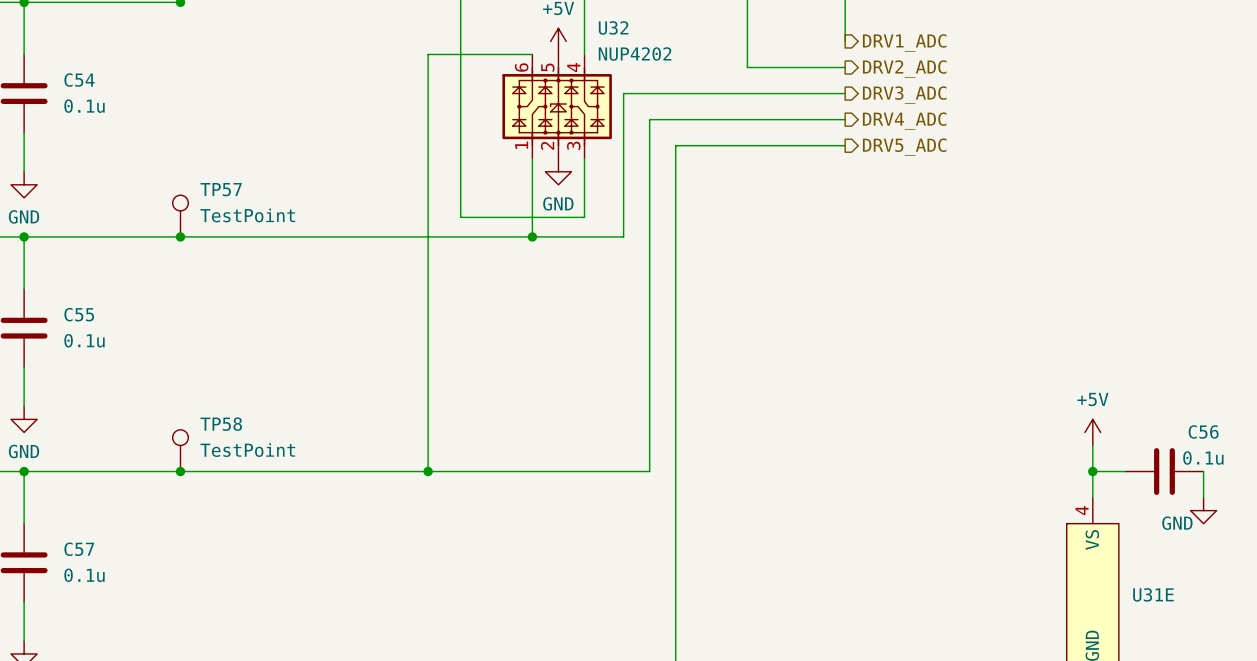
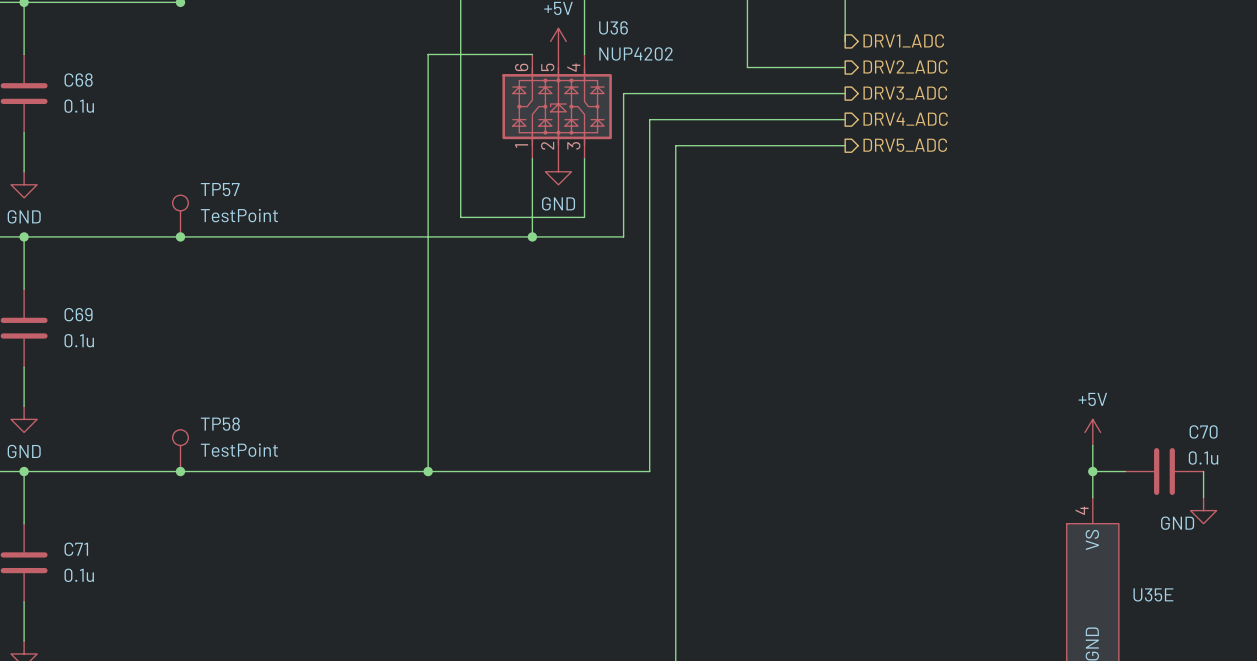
U32 name: U32 (613, 27) -> U36 (613, 27)
C54 name: C54 (79, 80) -> C68 (78, 80)
C55 name: C55 (79, 314) -> C69 (78, 314)
C56 name: C56 (1203, 431) -> C70 (1203, 431)
C57 name: C57 (79, 549) -> C71 (76, 549)
U31E name: U31E (1153, 594) -> U35E (1153, 594)

